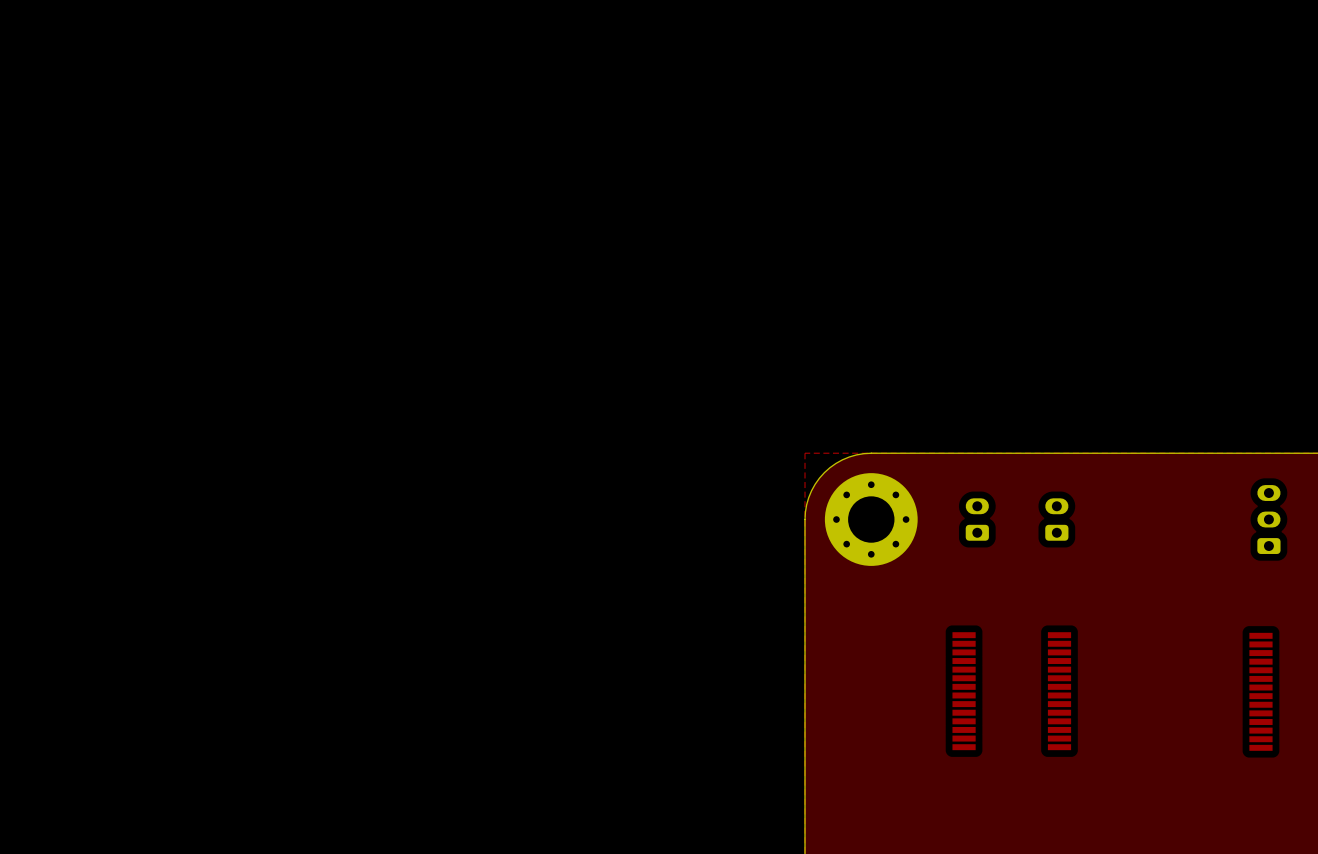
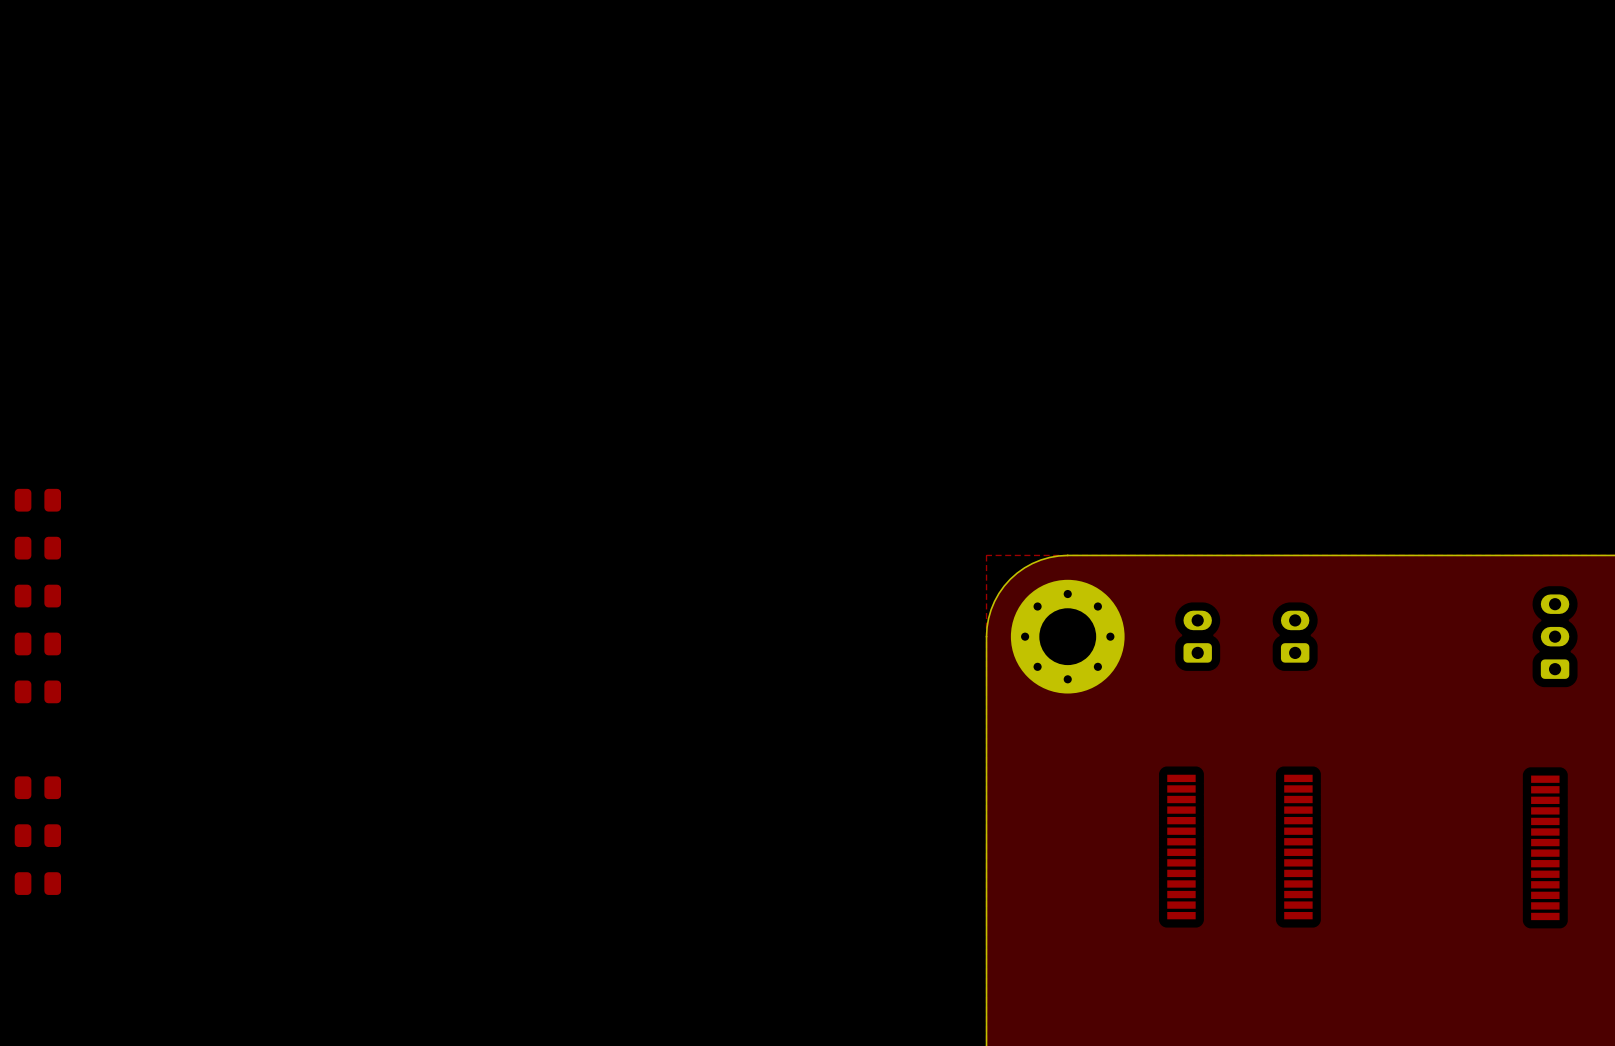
part: none -> (37, 500)
part: none -> (37, 548)
part: none -> (37, 596)
part: none -> (37, 643)
part: none -> (37, 691)
part: none -> (37, 787)
part: none -> (37, 835)
part: none -> (37, 883)

